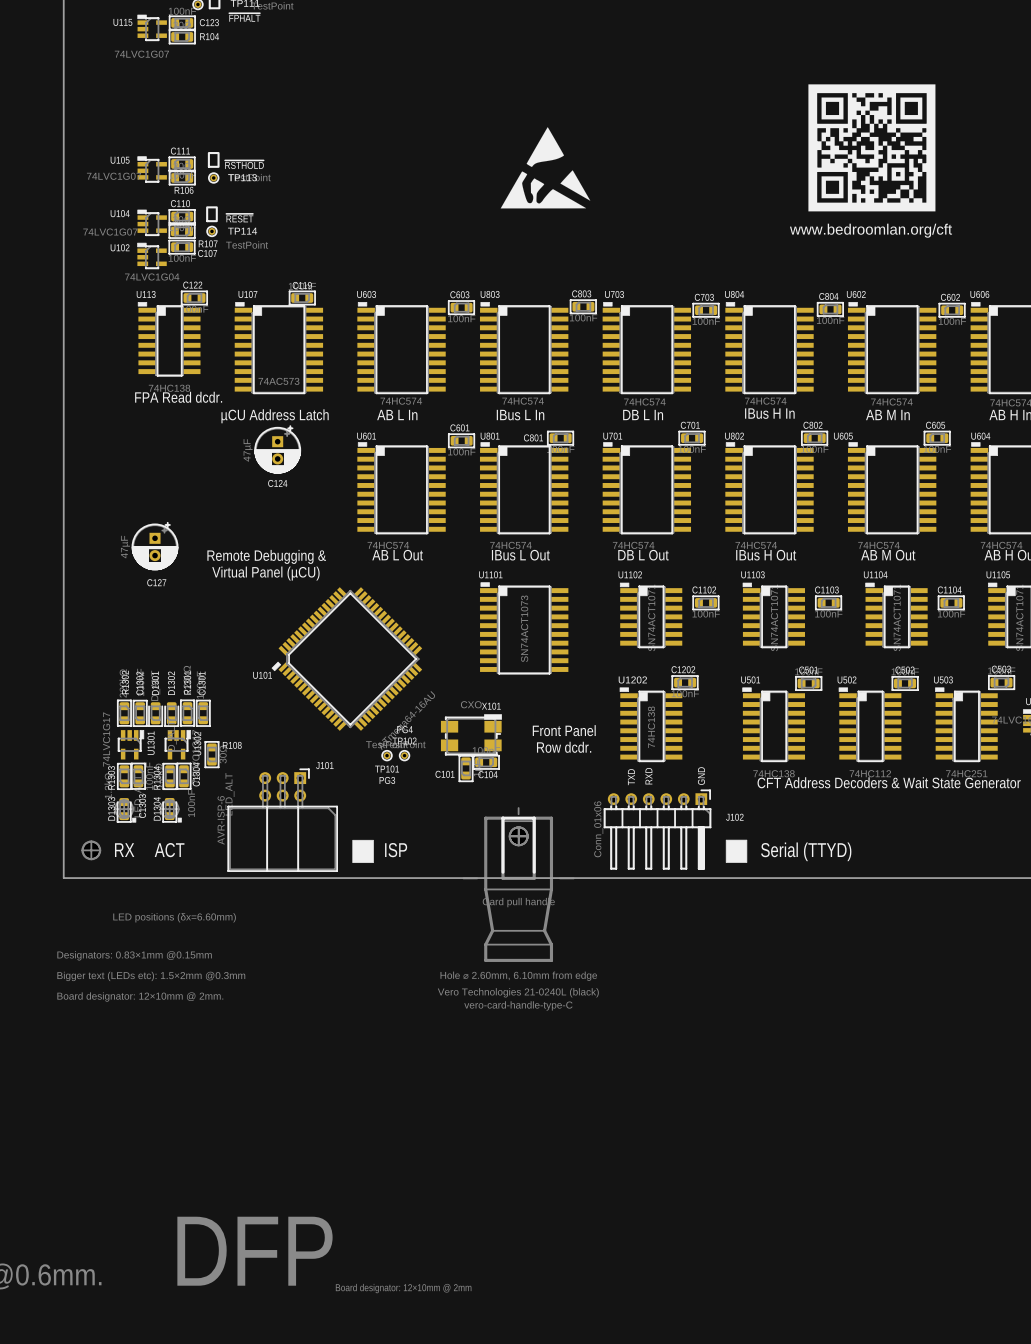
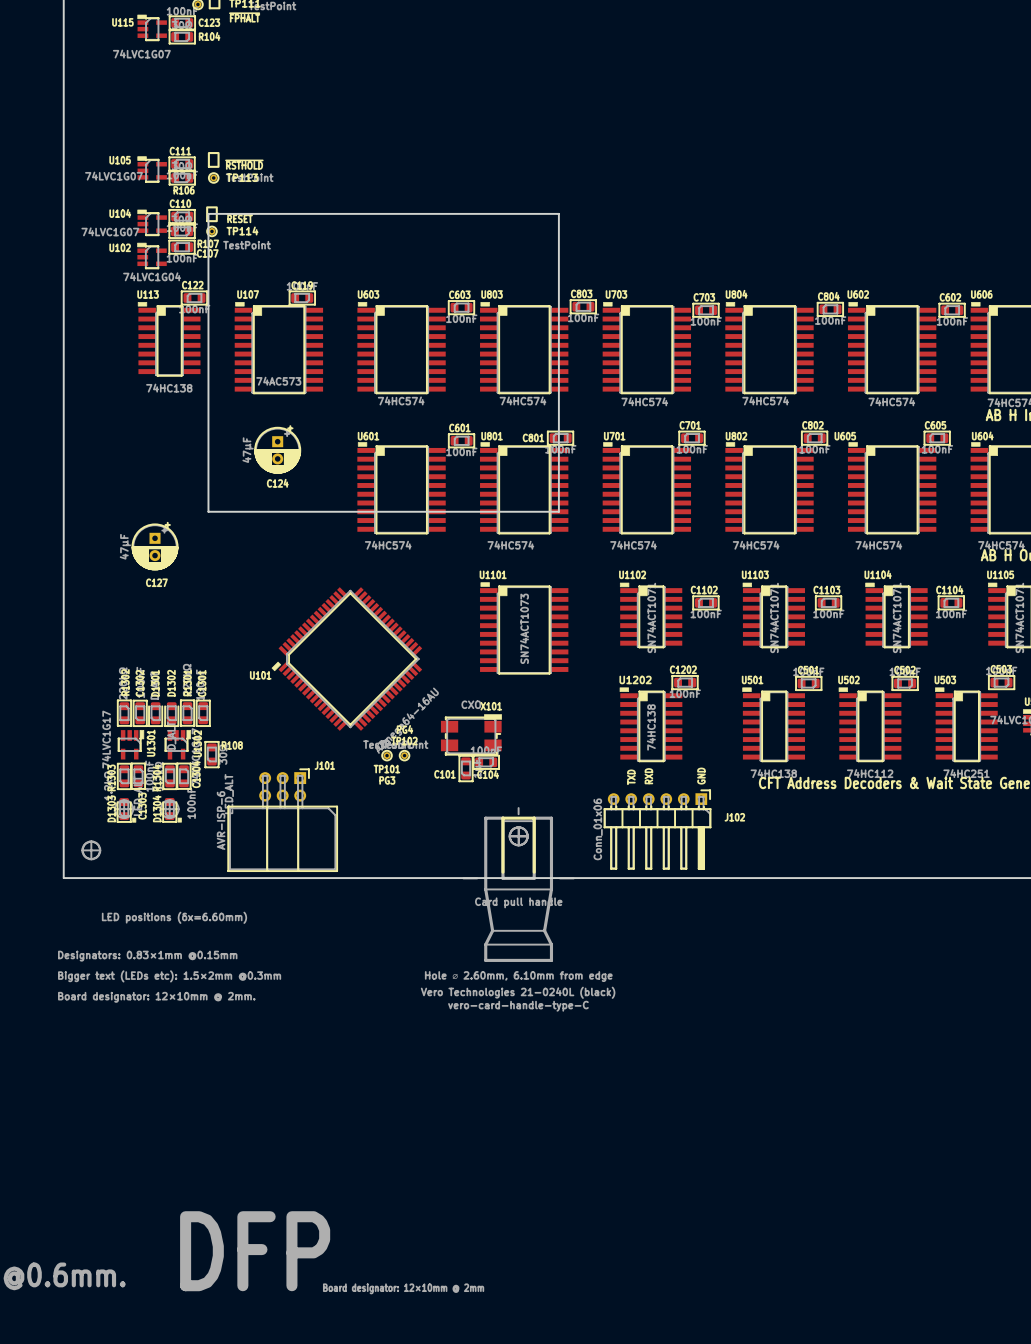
drawing: [808, 84, 936, 212] -> none
drawing: [500, 127, 591, 209] -> none
board edge: none -> (208, 213) (558, 213) (558, 511) (208, 511) (208, 213)
text: www.bedroomlan.org/cft (871, 230) -> none
text: FPA Read dcdr. (178, 397) -> none
text: IBus H In (769, 413) -> none
text: AB L In (397, 415) -> none
text: IBus L In (520, 415) -> none
text: DB L In (643, 415) -> none
text: AB M In (887, 415) -> none
text: µCU Address Latch (275, 416) -> none
text: AB L Out (397, 555) -> none
text: IBus L Out (520, 555) -> none
text: DB L Out (643, 555) -> none
text: IBus H Out (766, 555) -> none
text: AB M Out (888, 555) -> none
text: Remote Debugging & (266, 556) -> none
text: Virtual Panel (µCU) (265, 573) -> none
text: Front Panel (564, 730) -> none
text: Row dcdr. (564, 747) -> none
drawing: [352, 839, 374, 864] -> none
drawing: [725, 839, 748, 863] -> none
text: RX (124, 850) -> none
text: ACT (169, 850) -> none
text: ISP (396, 850) -> none
text: Serial (TTYD) (806, 851) -> none

